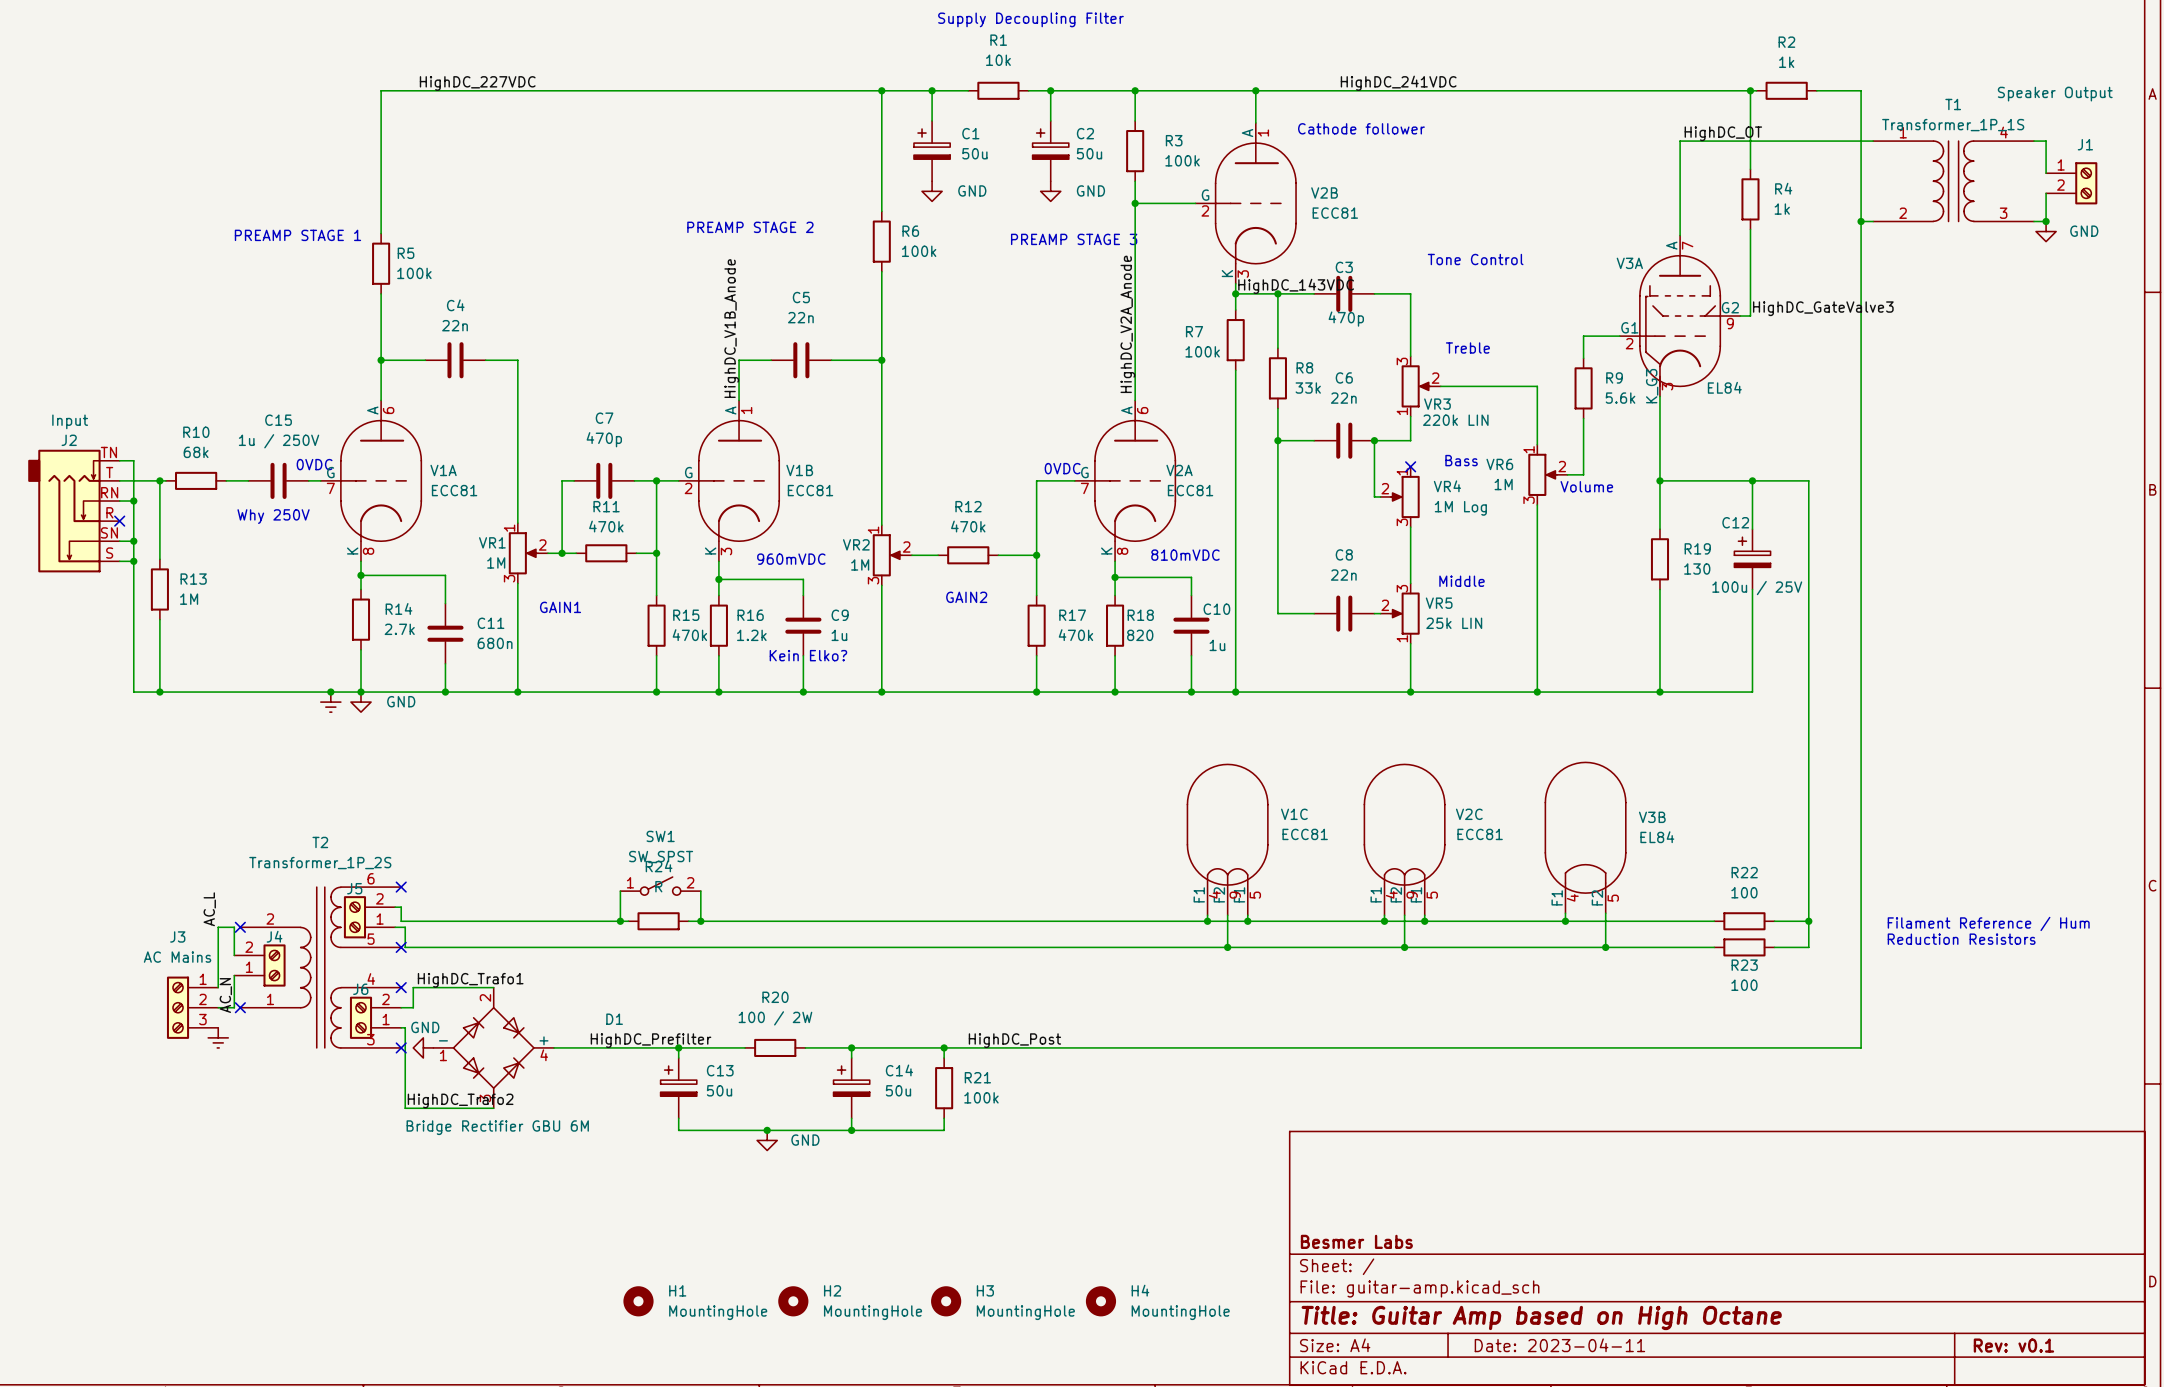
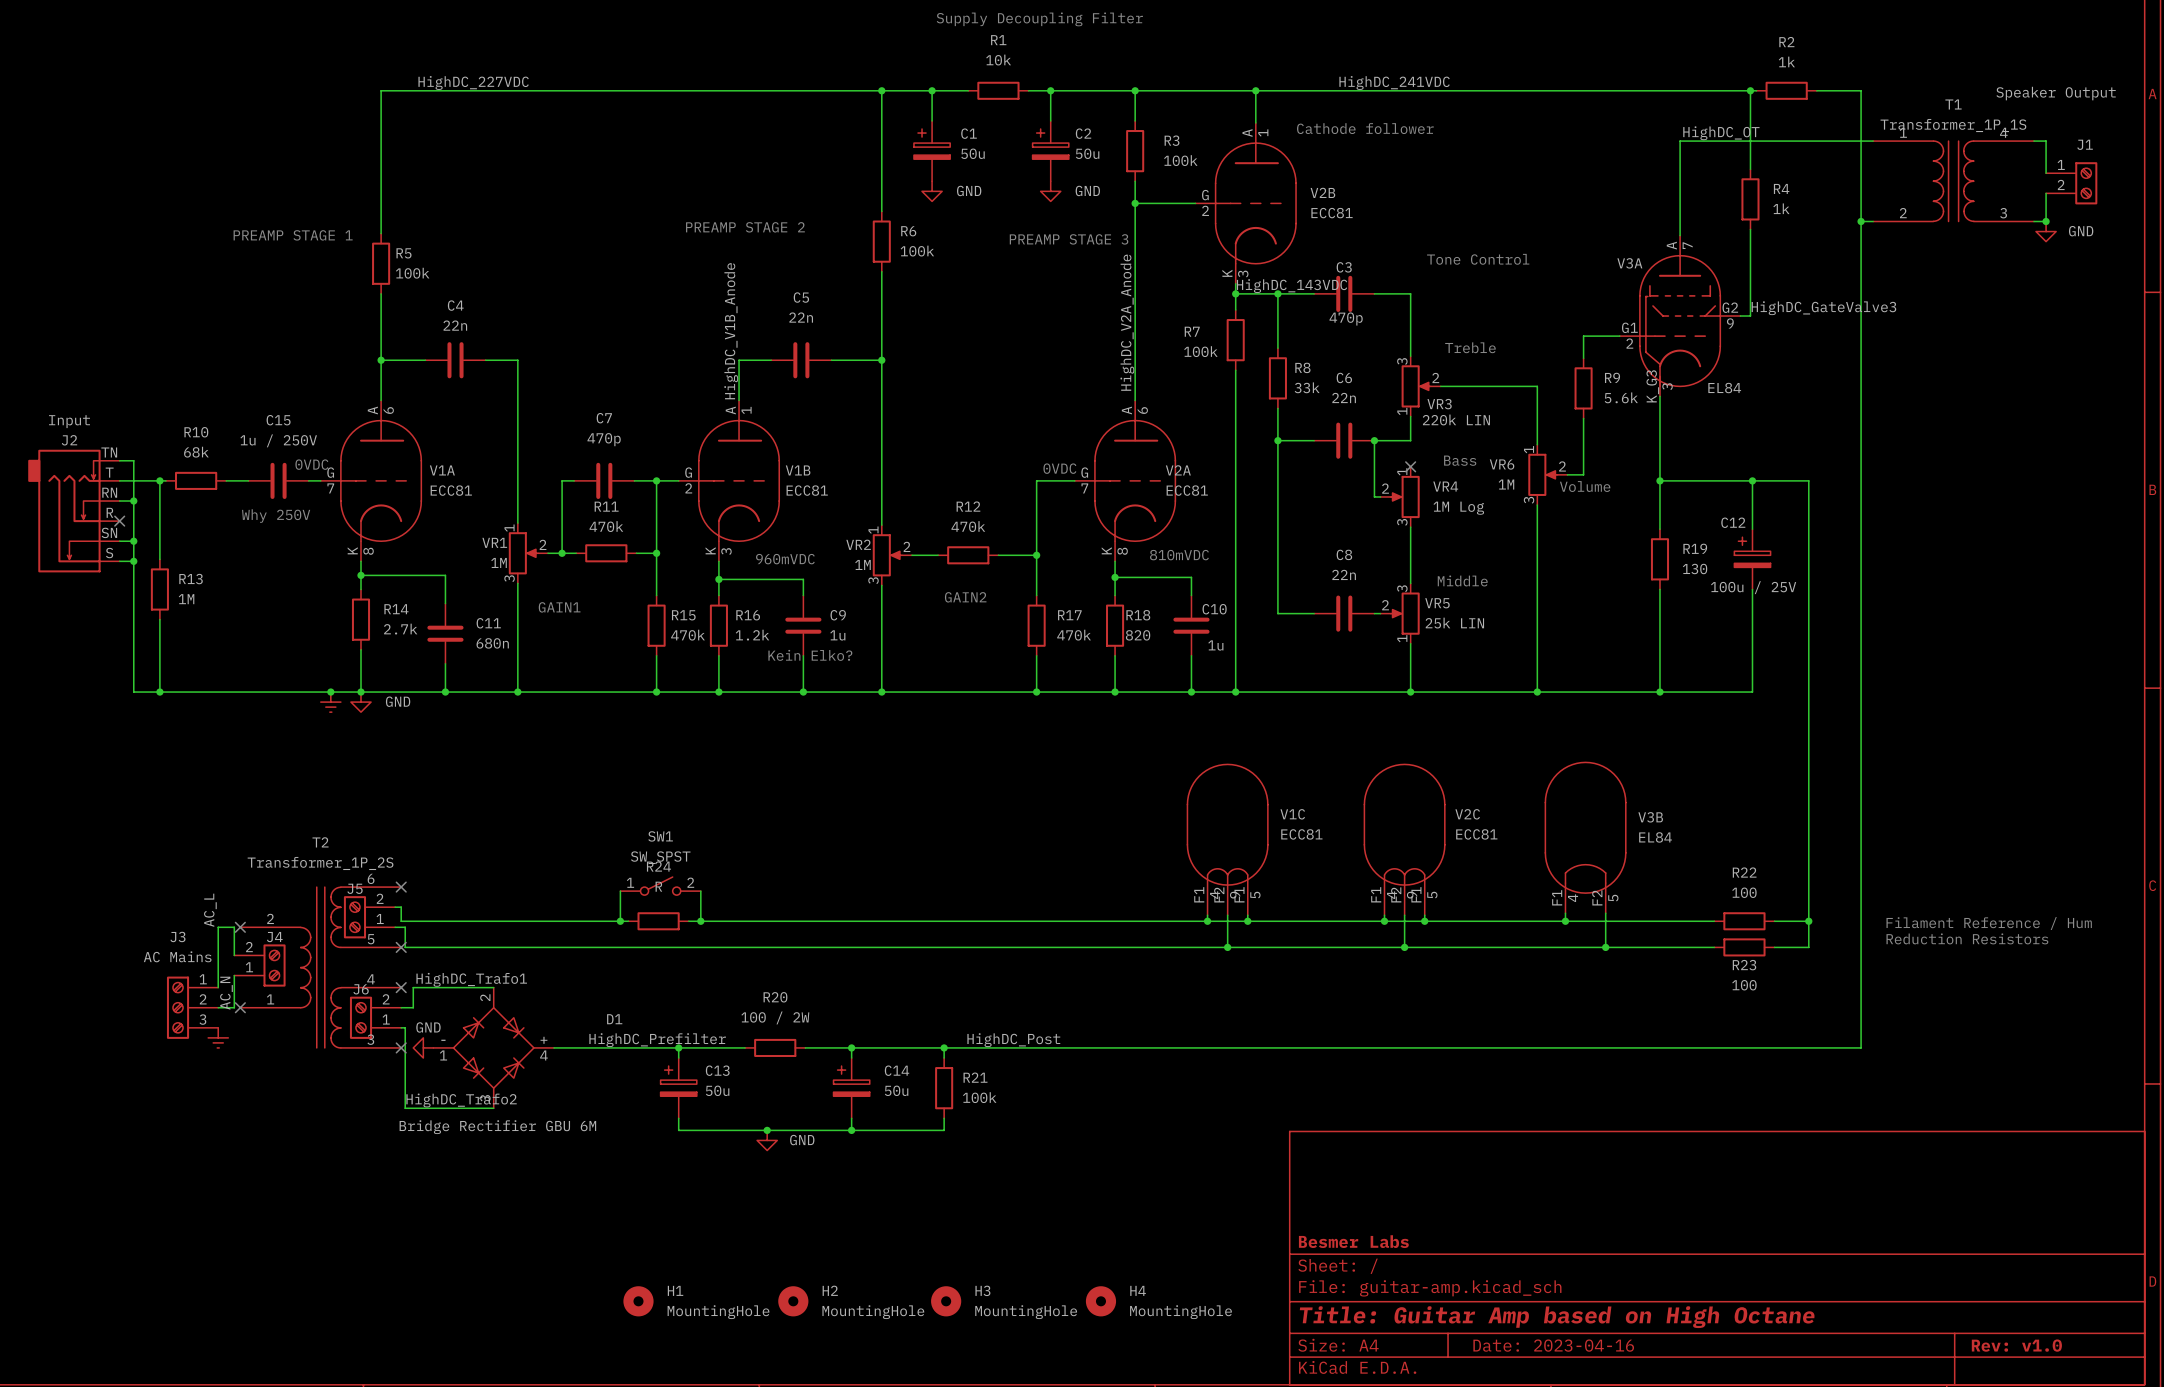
title block: Date: 2023-04-11 (1559, 1345) -> Date: 2023-04-16 (1553, 1345)
title block: Rev: v0.1 (2013, 1345) -> Rev: v1.0 (2016, 1345)

